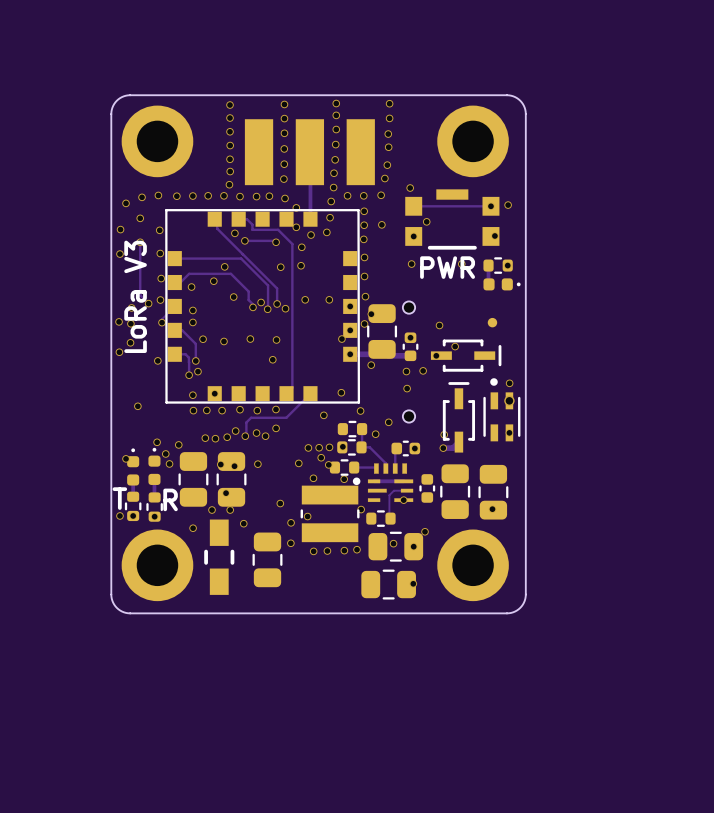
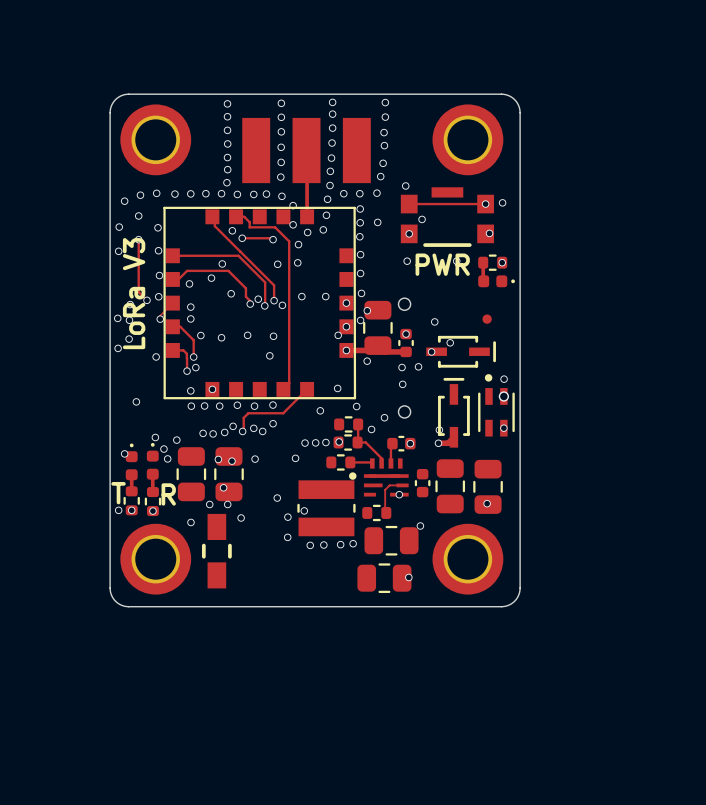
via: (321, 457) -> none
via: (328, 464) -> none
via: (313, 478) -> none
via: (344, 479) -> none
via: (361, 509) -> none
via: (393, 543) -> none
via: (413, 546) -> none
part: (267, 559) -> none

